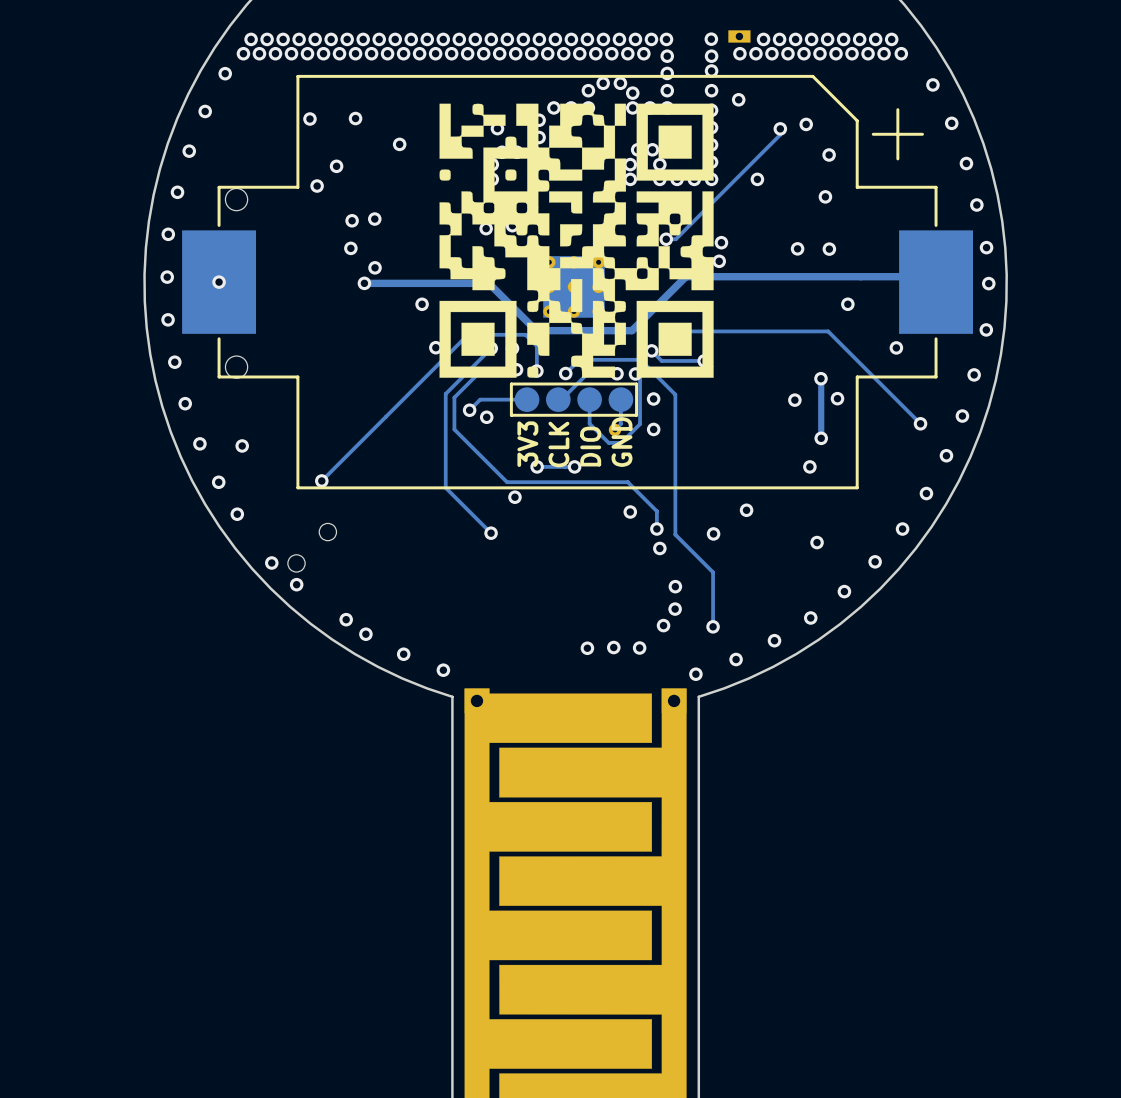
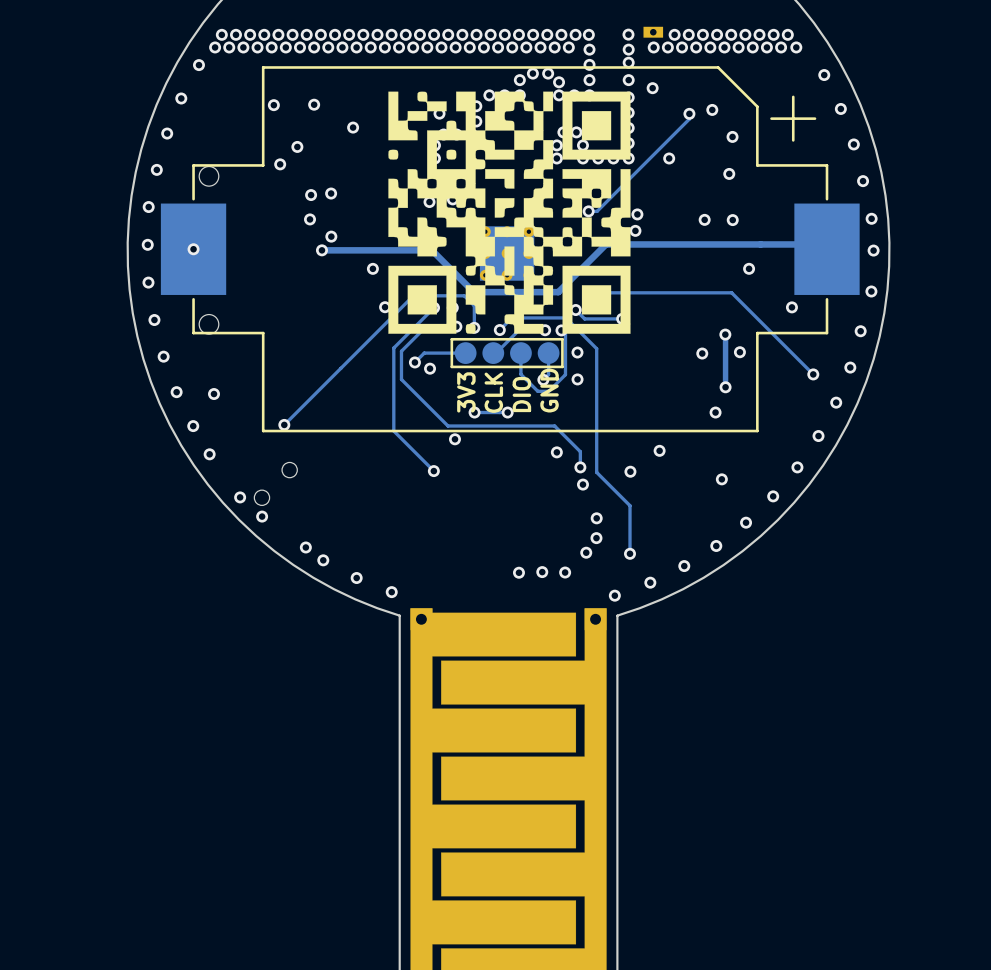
part: (615, 429) -> none
via: none -> (543, 379)

